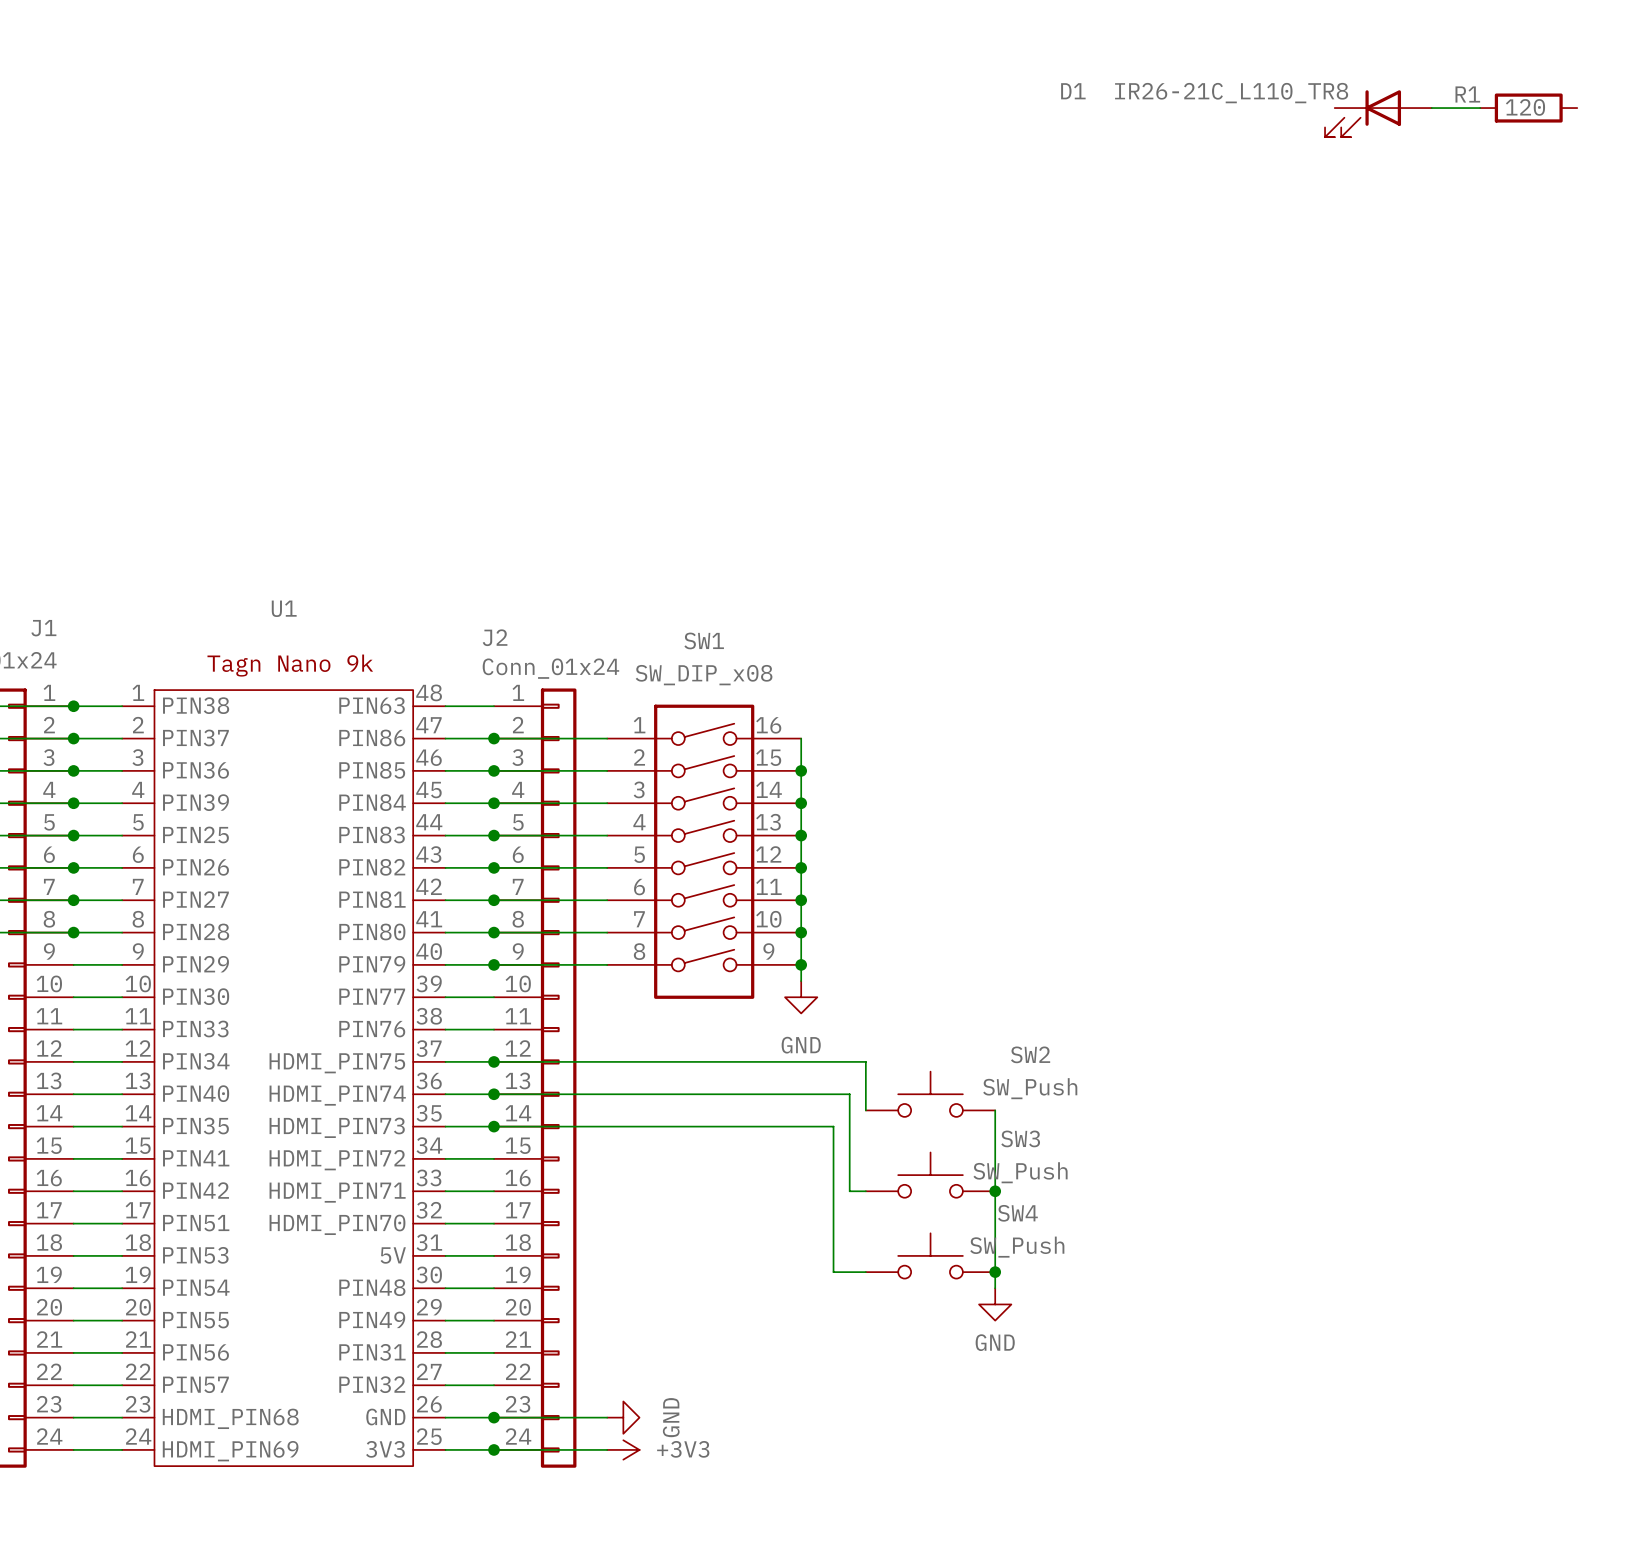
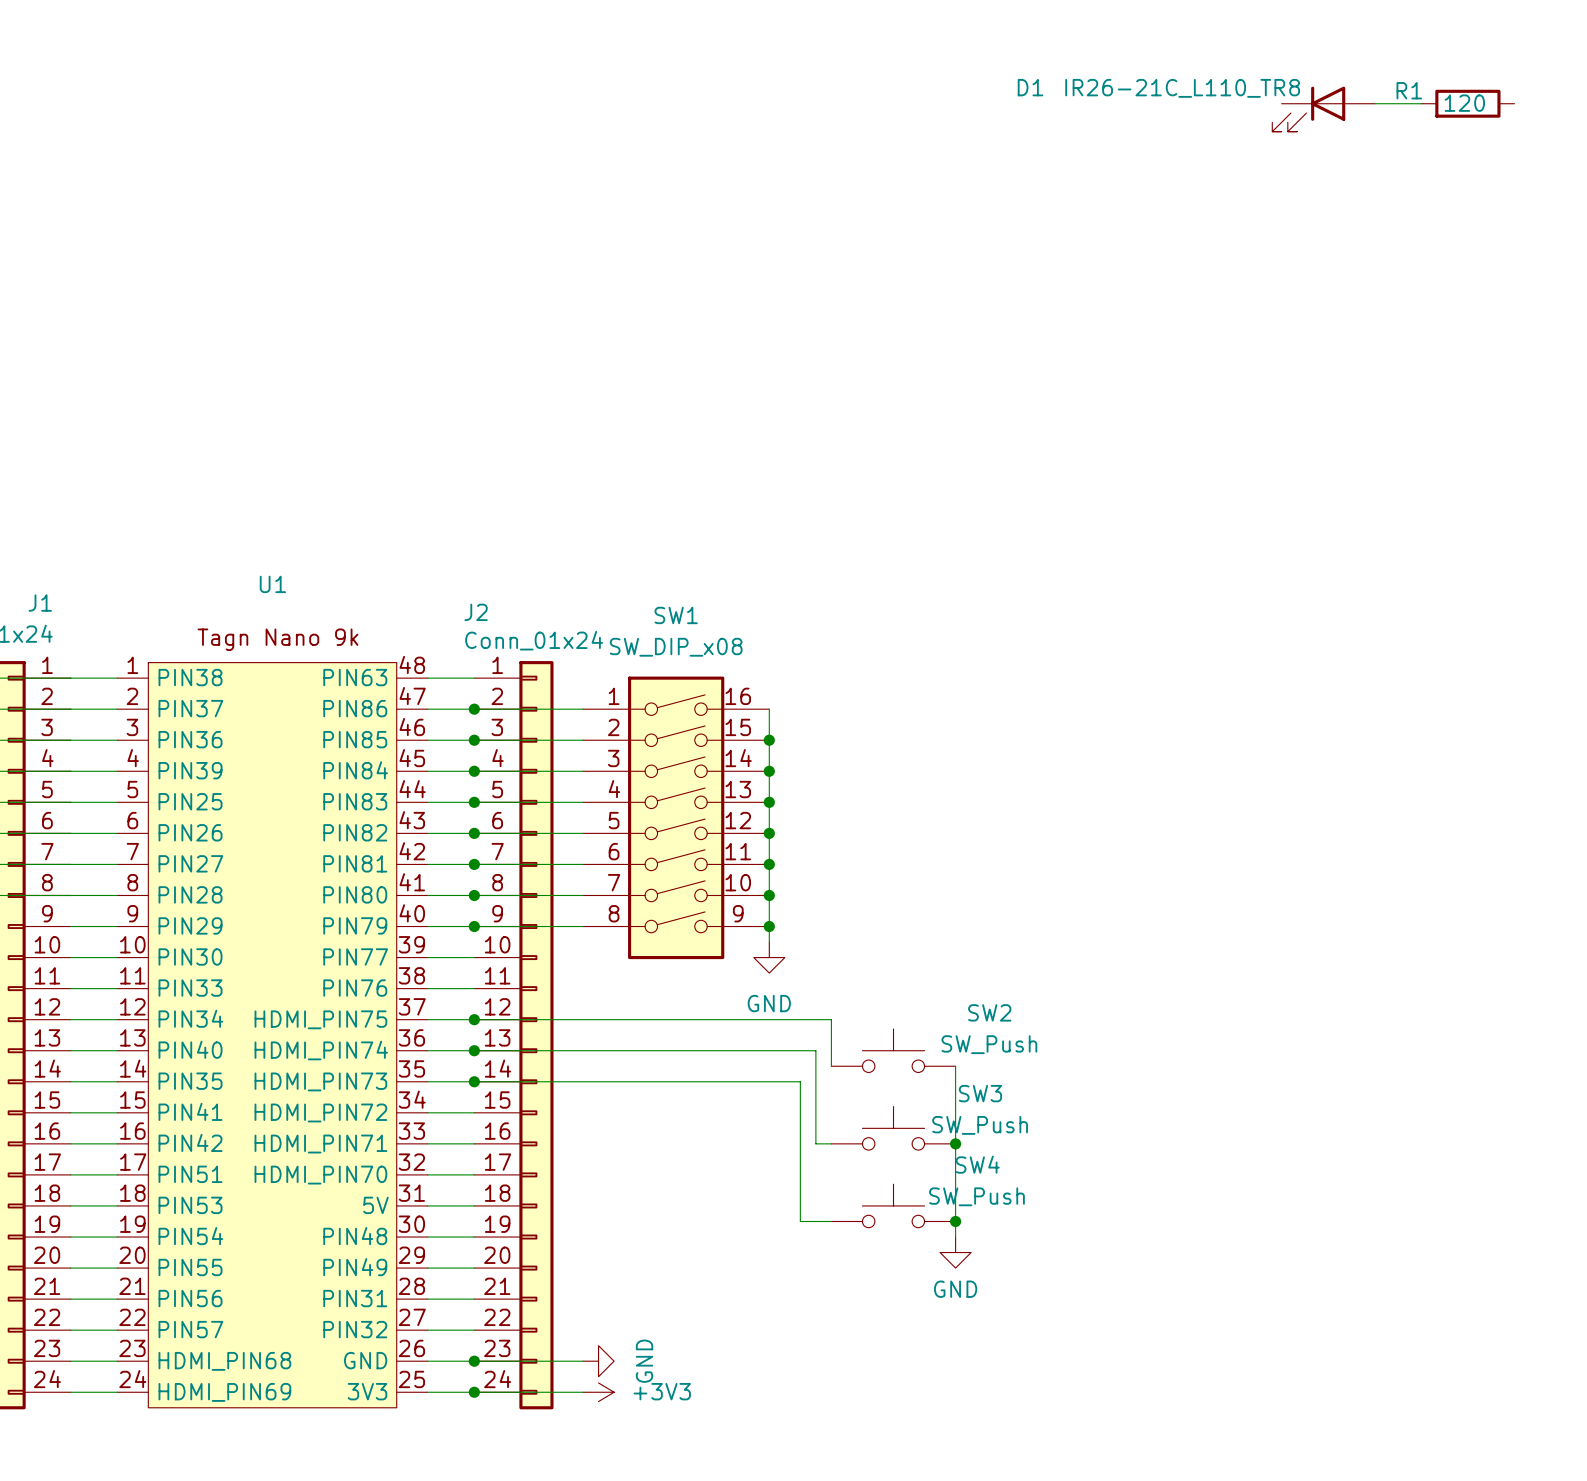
junction: (73, 706) -> none
junction: (73, 738) -> none
junction: (73, 770) -> none
junction: (73, 803) -> none
junction: (73, 835) -> none
junction: (73, 867) -> none
junction: (73, 900) -> none
junction: (73, 932) -> none

